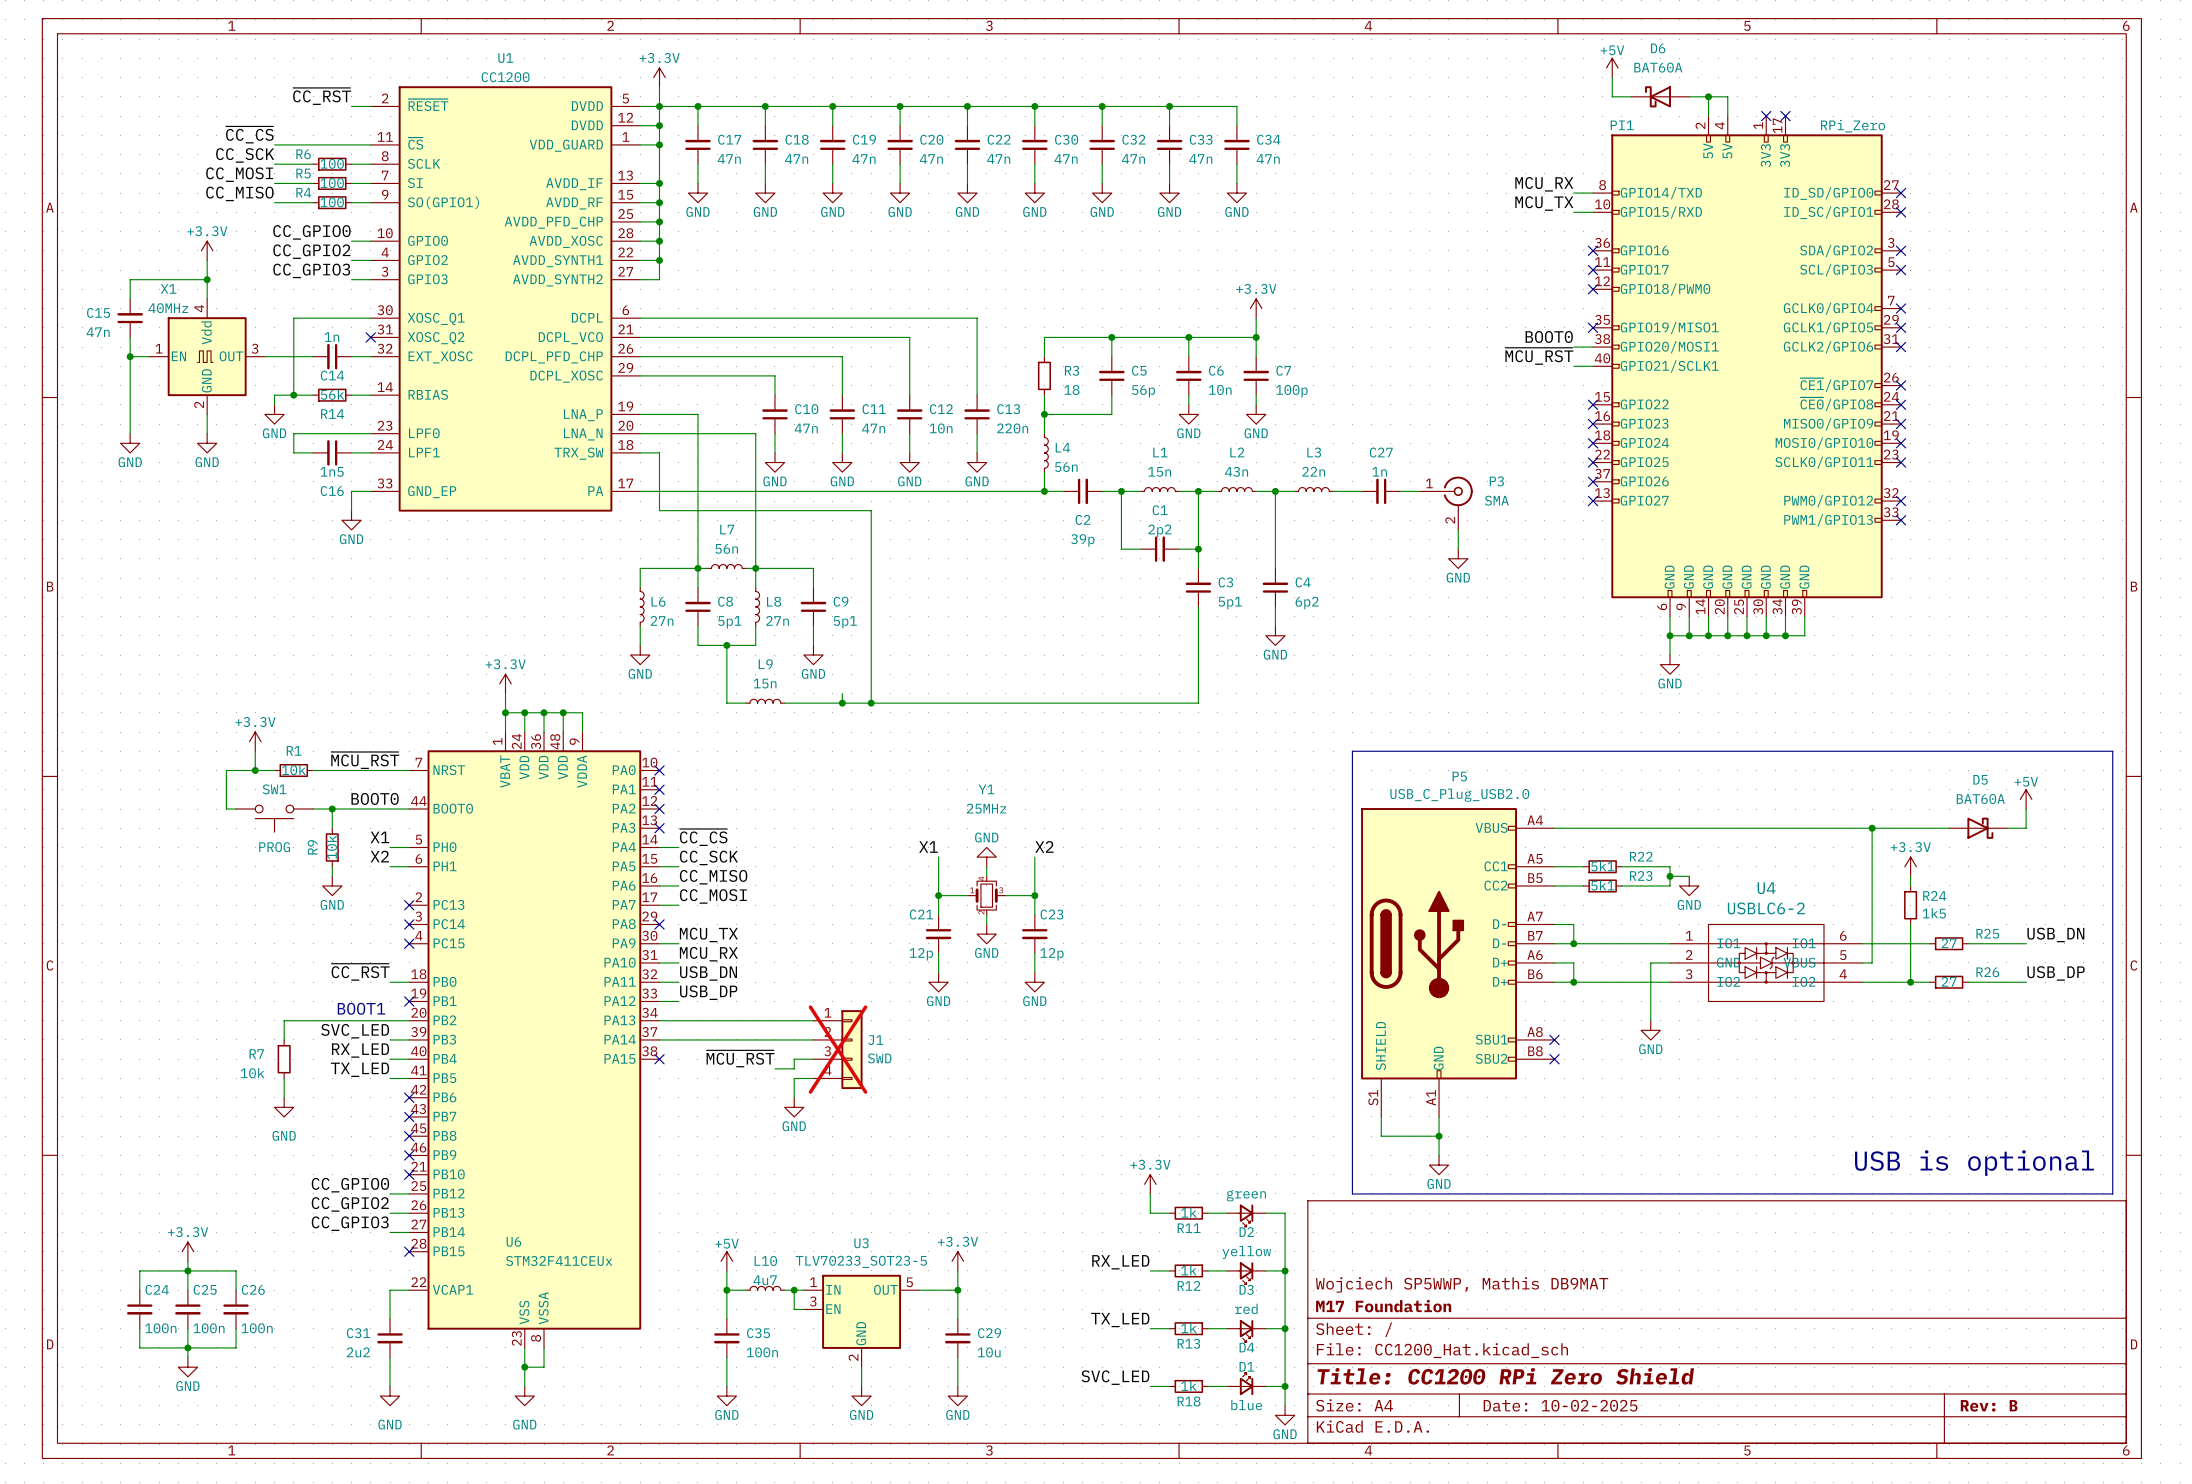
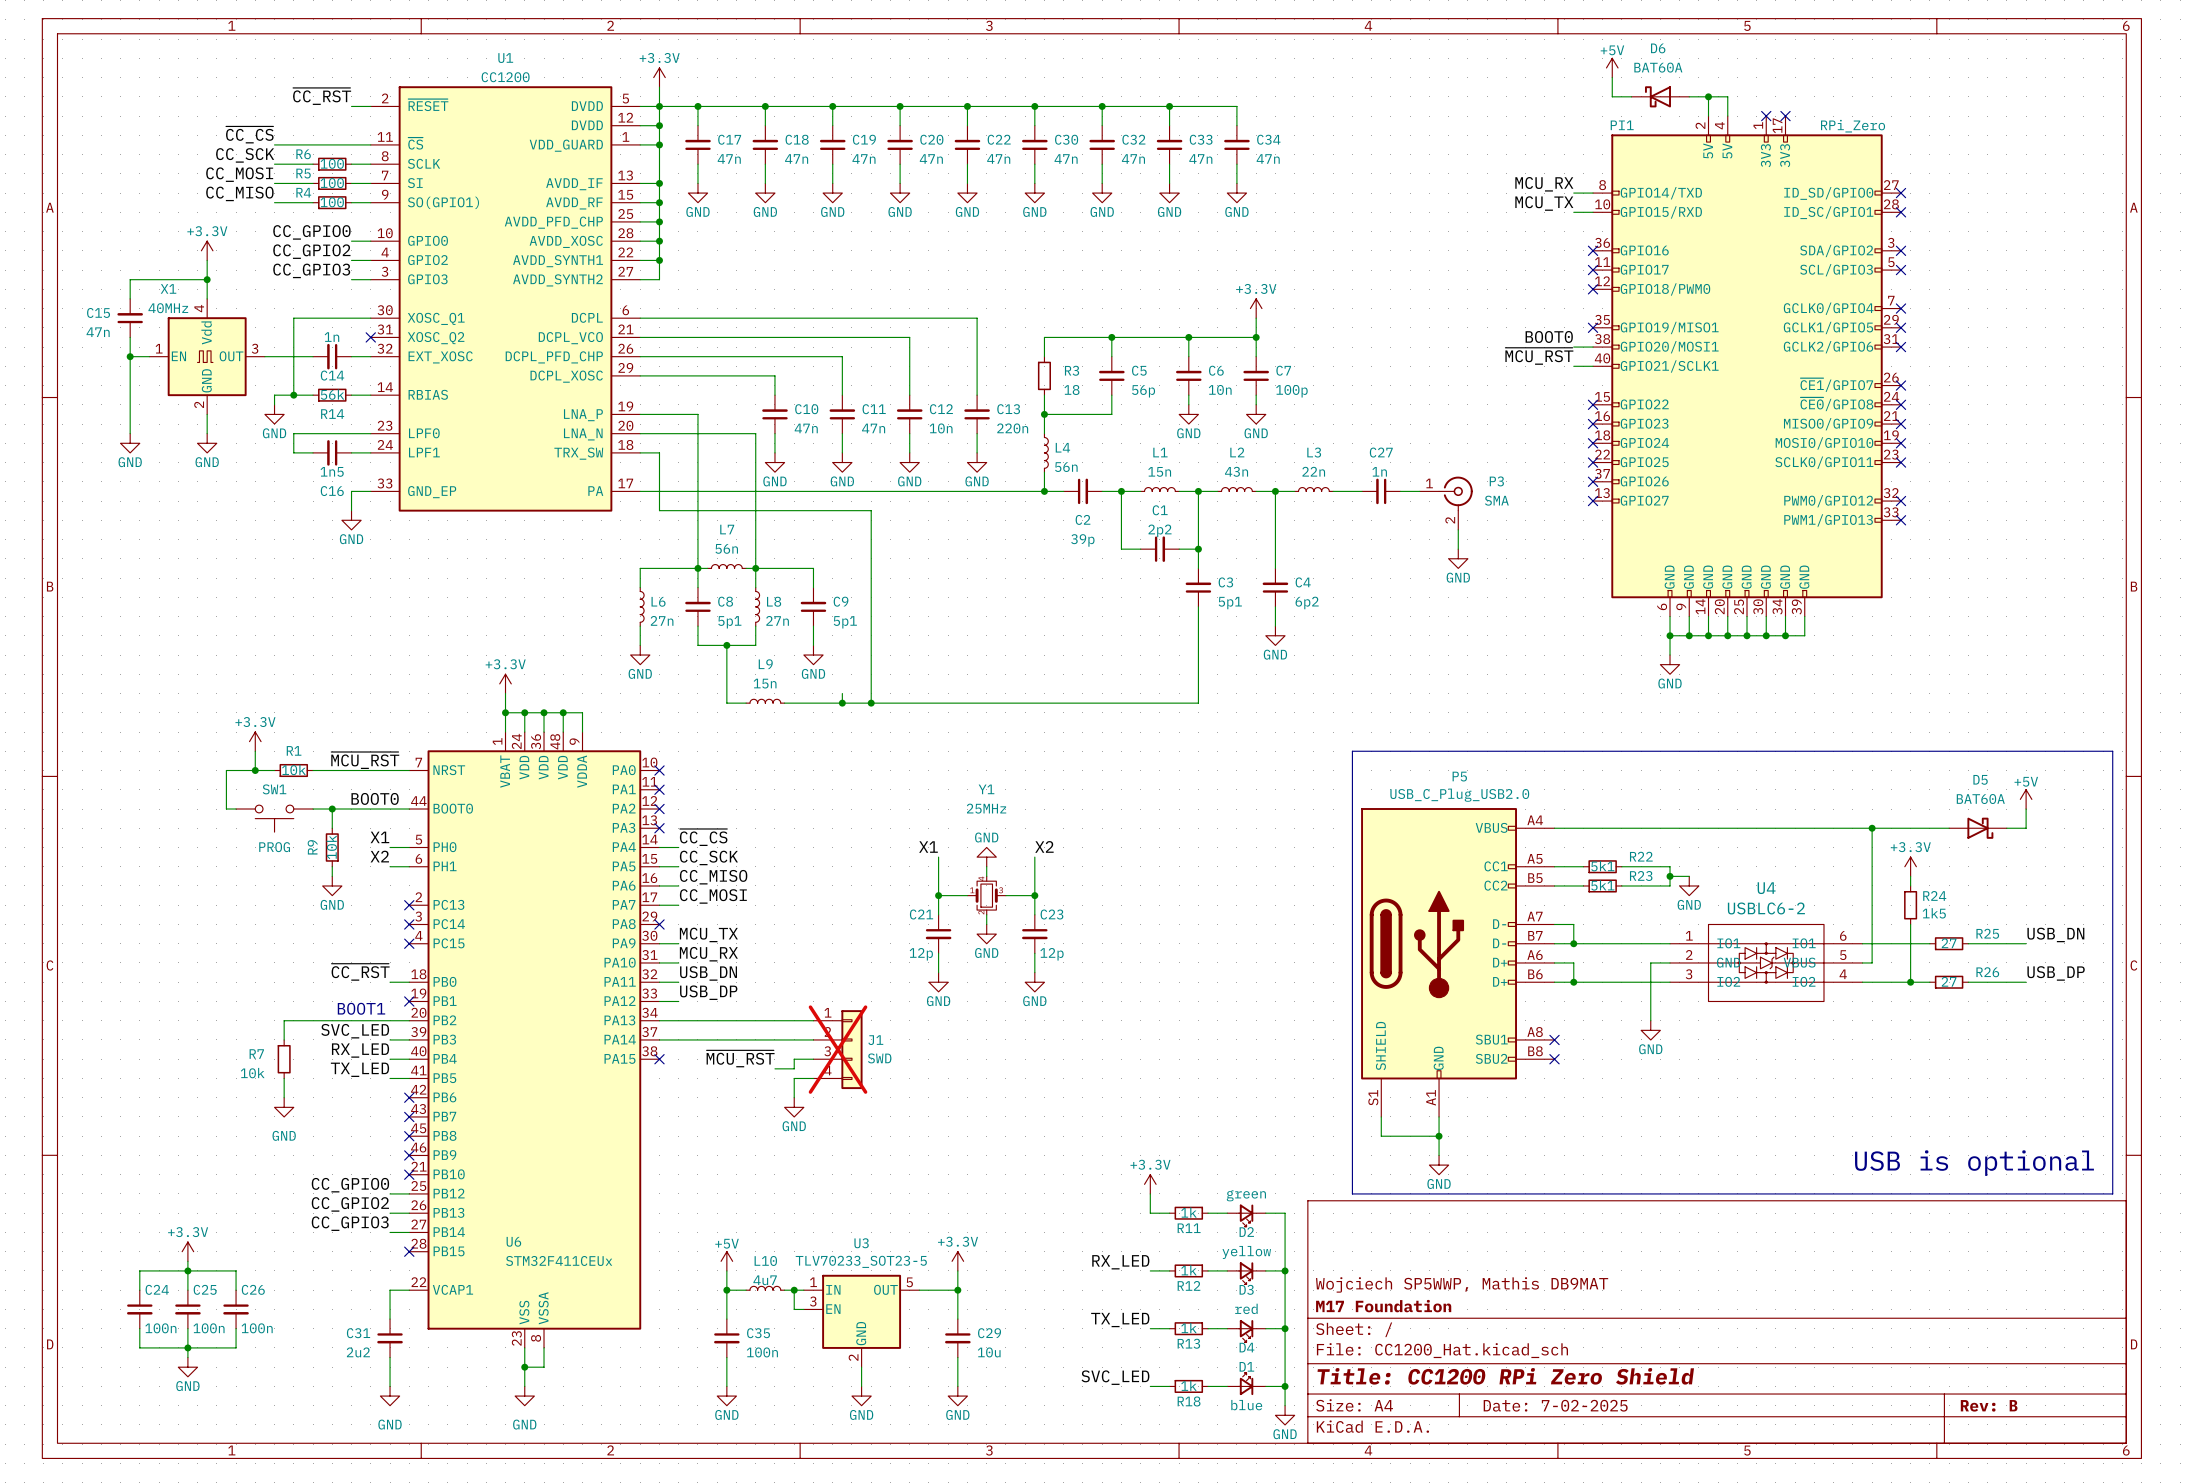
title block: Date: 10-02-2025 (1560, 1405) -> Date: 7-02-2025 (1555, 1405)

